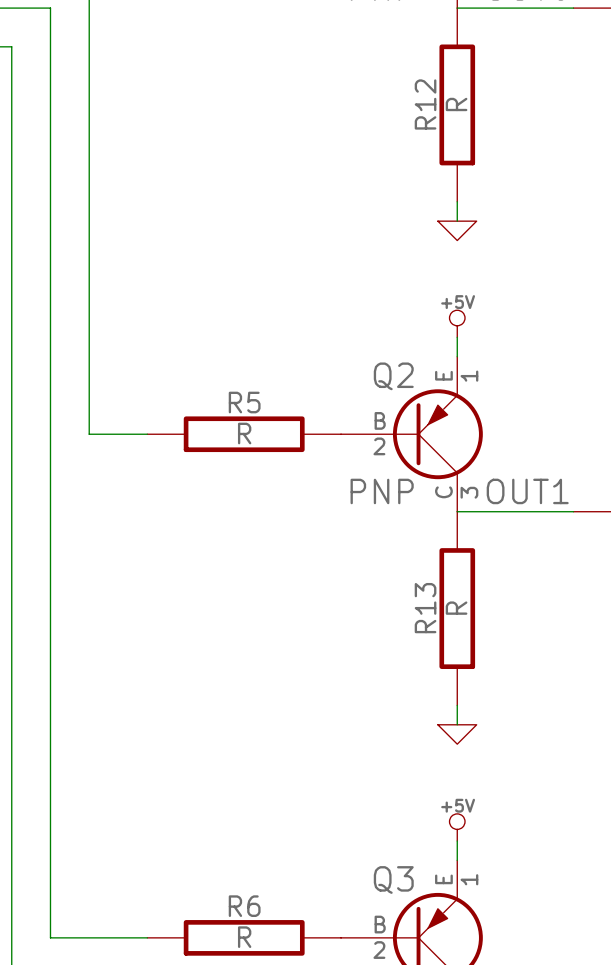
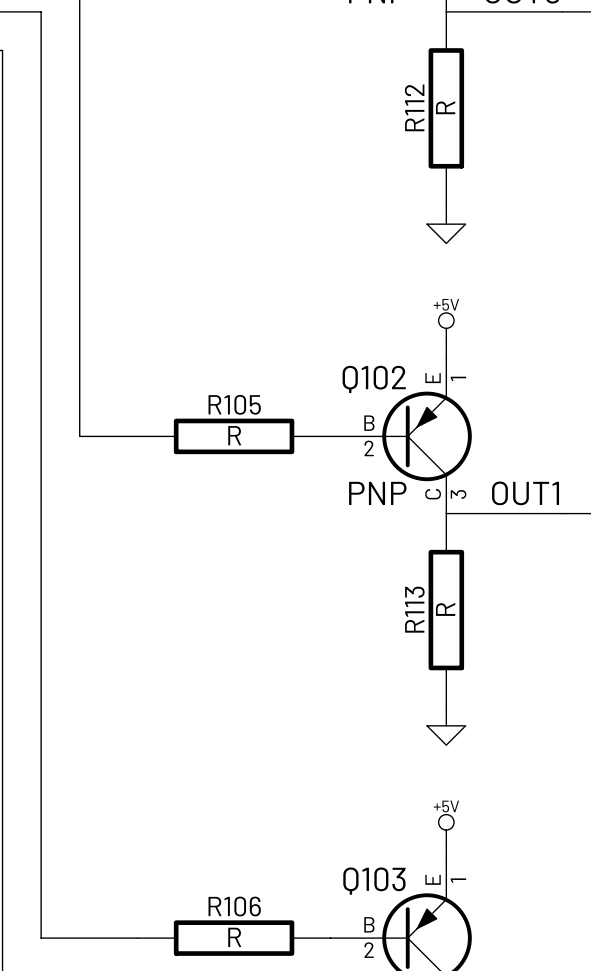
R12 name: R12 (425, 104) -> R112 (414, 107)
Q2 name: Q2 (393, 376) -> Q102 (374, 379)
R5 name: R5 (244, 402) -> R105 (234, 404)
R13 name: R13 (425, 608) -> R113 (414, 609)
Q3 name: Q3 (393, 880) -> Q103 (374, 881)
R6 name: R6 (244, 906) -> R106 (234, 906)

